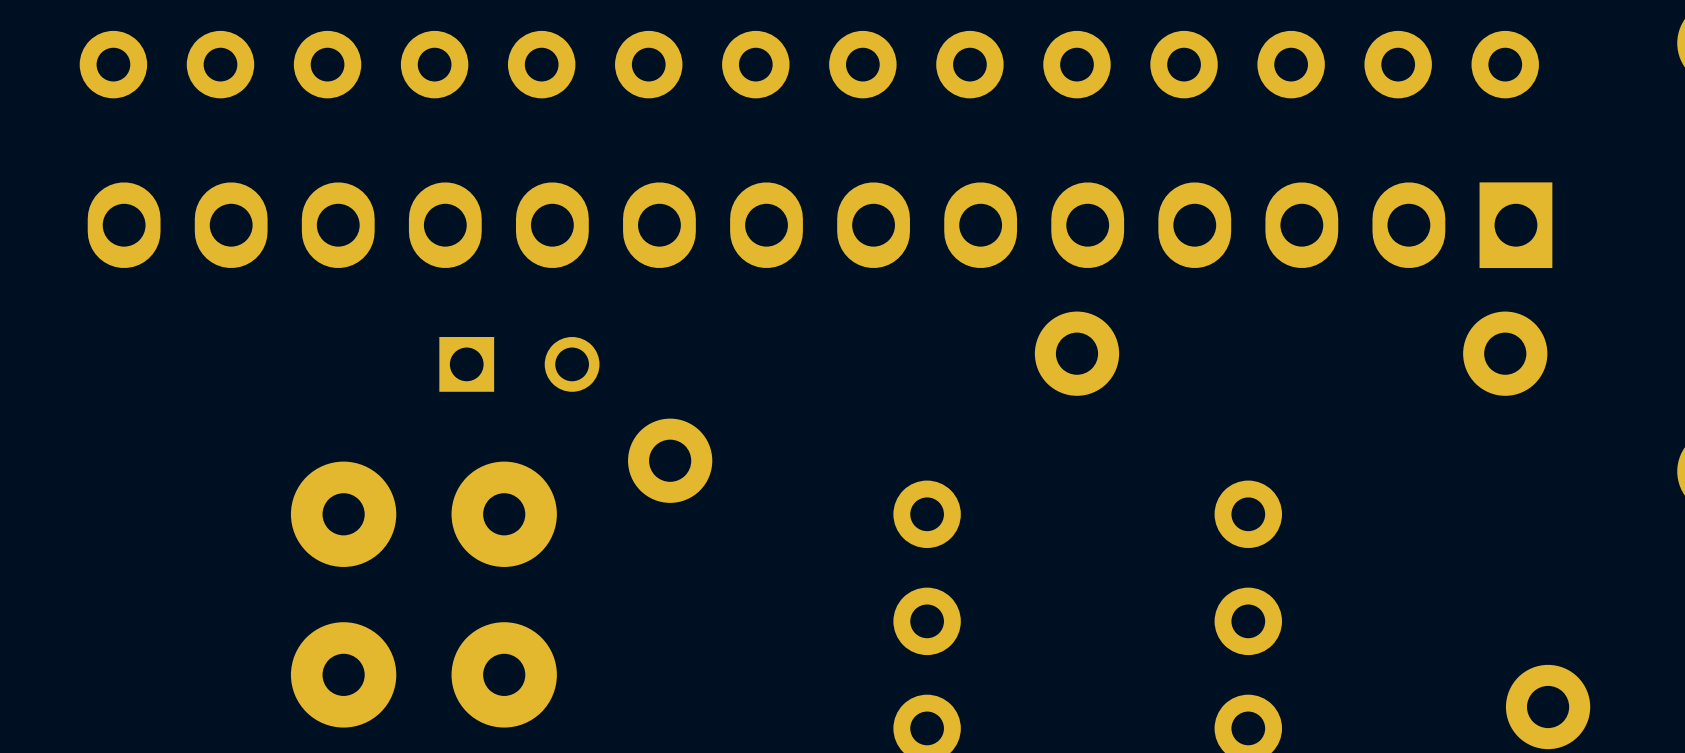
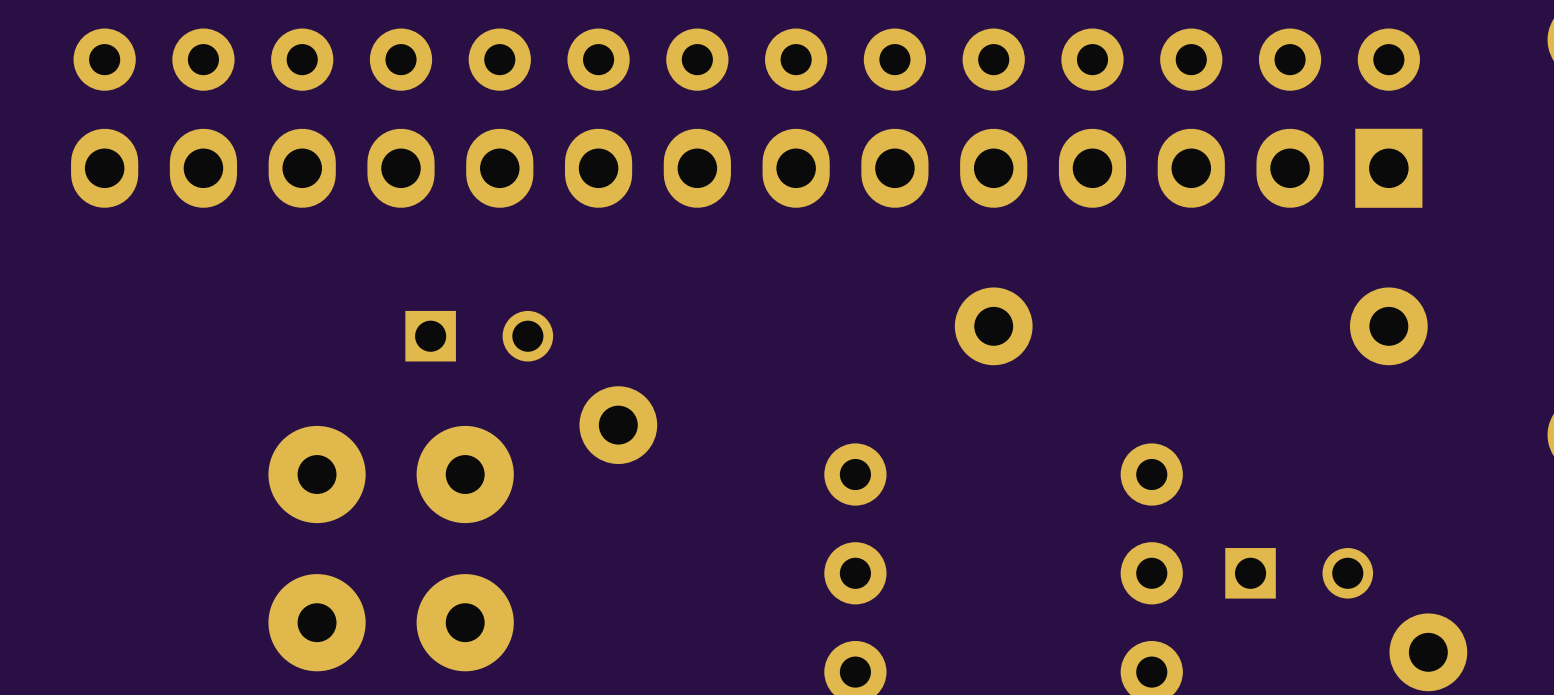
part position: (820, 225) -> (746, 168)
part: none -> (1299, 573)

